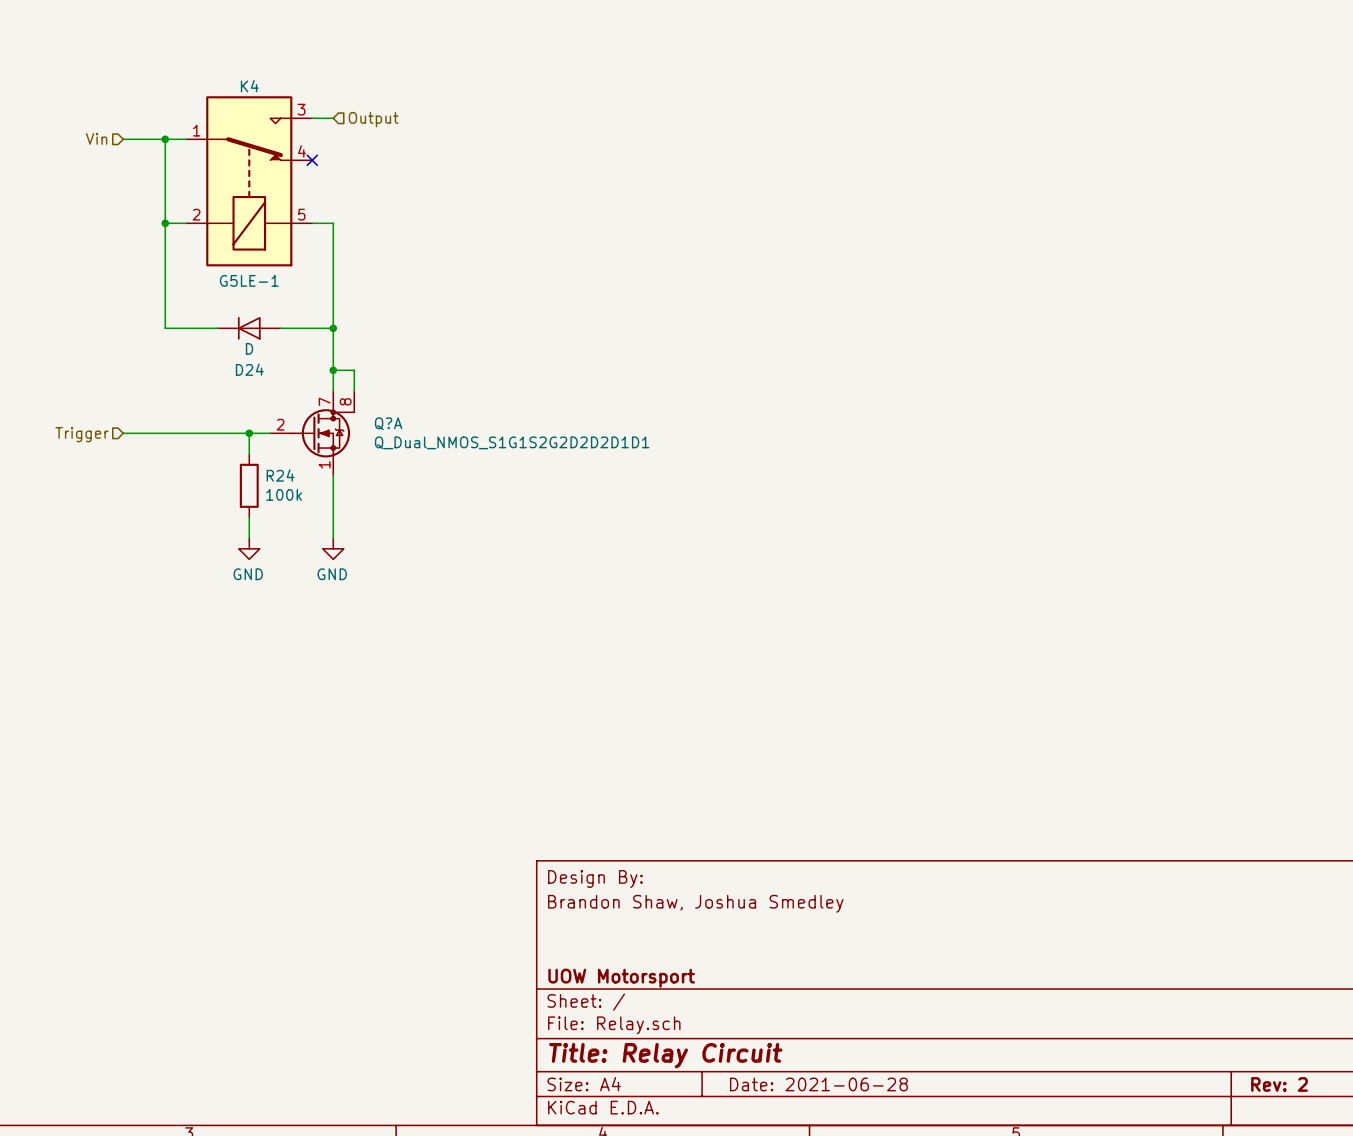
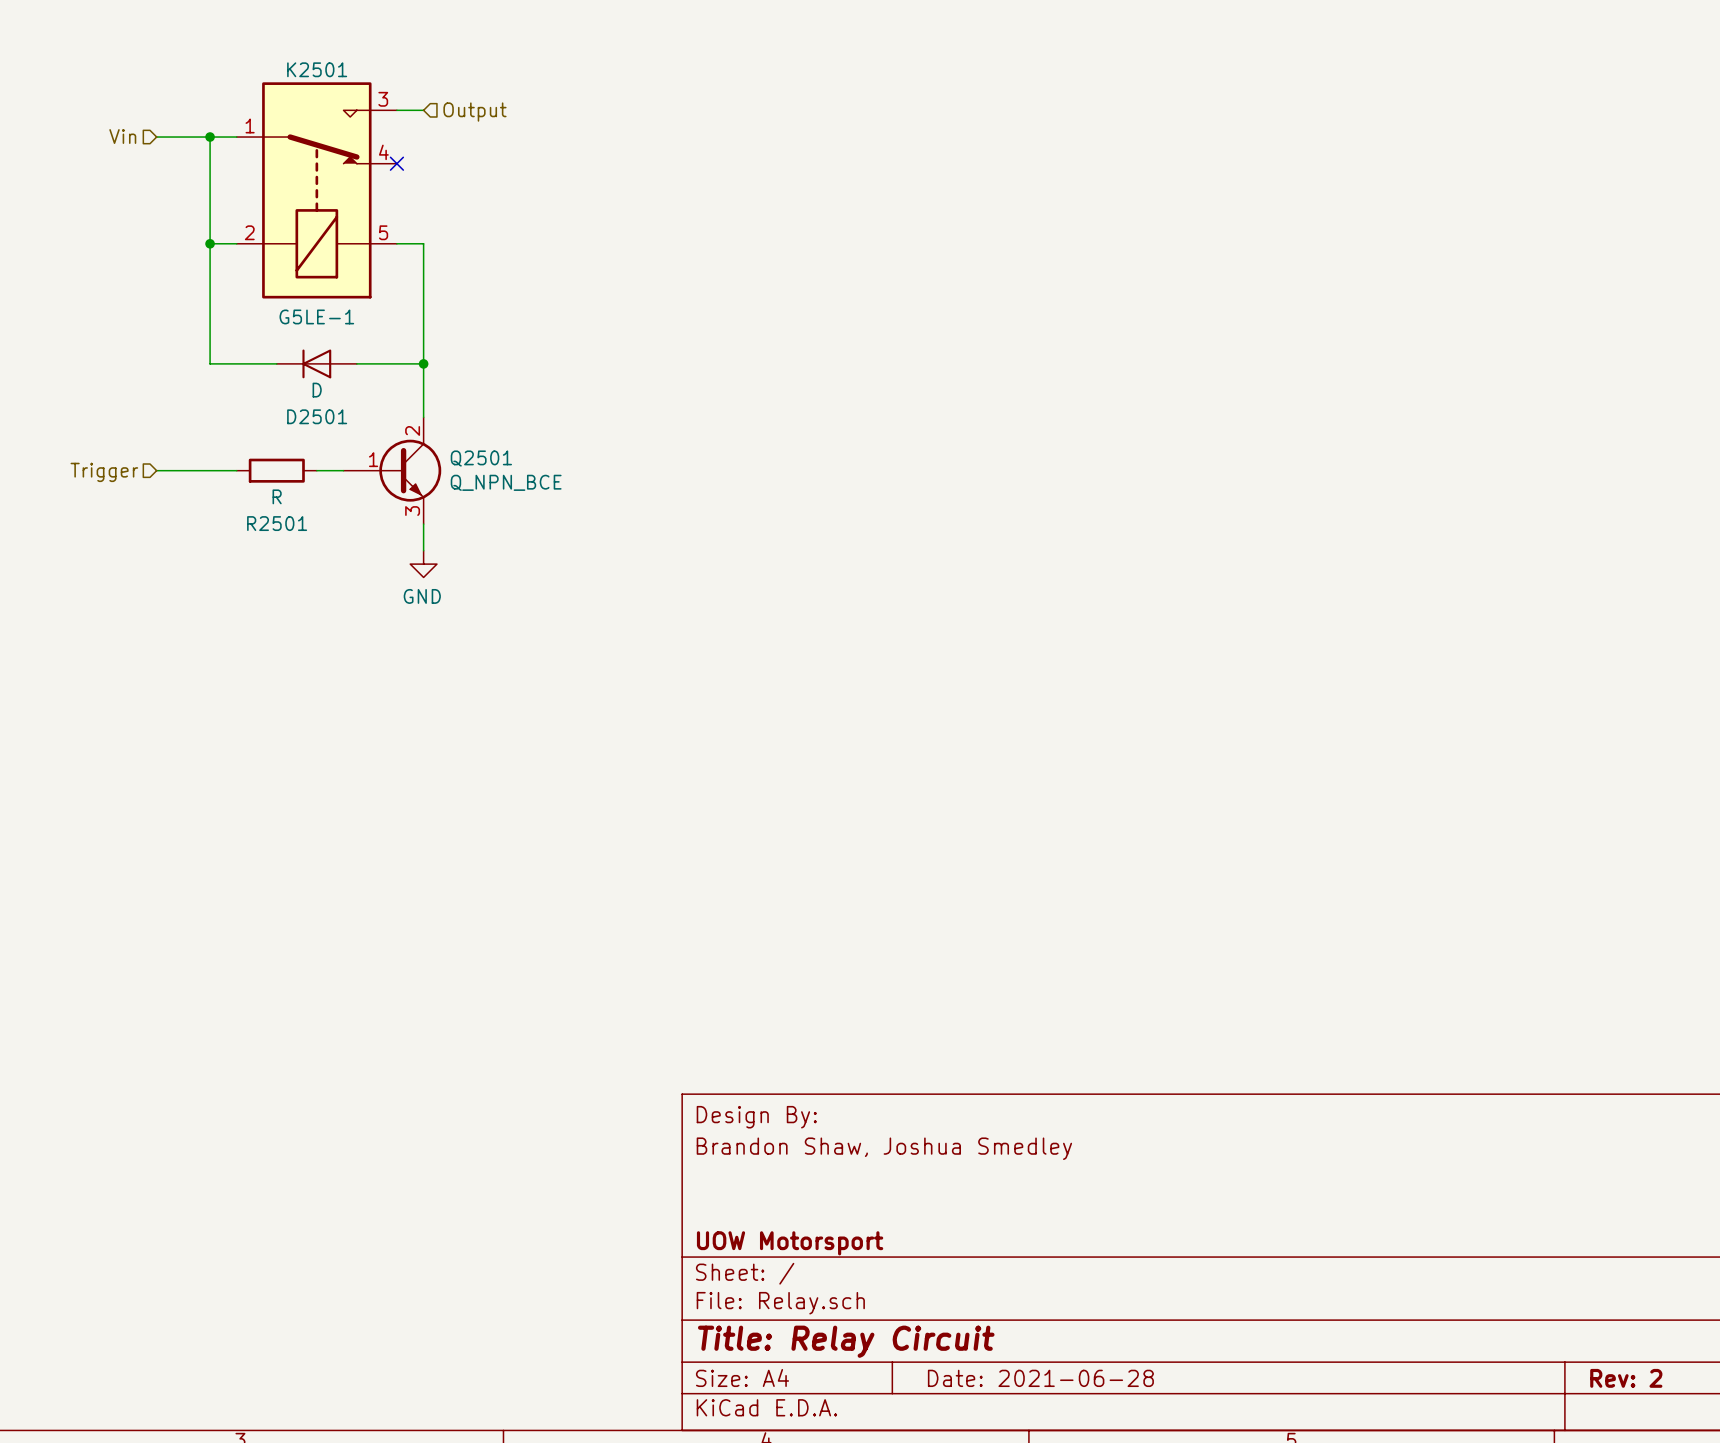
wire: none -> (210, 137) (210, 177)
junction: none -> (210, 137)
wire: (312, 118) (333, 118) -> (396, 110) (423, 110)
hierarchical label position: Output (373, 119) -> Output (474, 112)
hierarchical label position: Vin (96, 138) -> Vin (122, 136)
wire: (123, 139) (186, 139) -> (156, 137) (236, 137)
junction: (165, 139) -> none
K2501: none -> G5LE-1 (316, 190)
no-connect mark position: (312, 160) -> (396, 163)
K4: G5LE-1 (249, 181) -> none
junction: none -> (210, 243)
wire: (165, 223) (186, 223) -> (210, 243) (236, 243)
junction: (165, 223) -> none
wire: (312, 223) (333, 223) -> (396, 243) (423, 243) (423, 283)
wire: (165, 286) (165, 328) (217, 328) -> (210, 363) (276, 363)
D2501: none -> D (316, 363)
wire: none -> (356, 363) (423, 363)
junction: none -> (423, 363)
D24: D (249, 328) -> none
wire: (280, 328) (333, 328) (333, 391) -> none
junction: (333, 328) -> none
wire: none -> (156, 470) (236, 470)
R2501: none -> R (276, 470)
wire: none -> (316, 470) (343, 470)
Q2501: none -> Q_NPN_BCE (392, 470)
wire: (333, 370) (354, 370) (354, 391) -> none
junction: (333, 370) -> none
wire: (123, 433) (270, 433) -> none
wire: (249, 433) (249, 454) -> (423, 524) (423, 550)
junction: (249, 433) -> none
Q?A: Q_Dual_NMOS_S1G1S2G2D2D2D1D1 (312, 433) -> none
hierarchical label position: Trigger (82, 434) -> Trigger (104, 472)
power symbol: none -> GND (423, 564)
wire: (333, 475) (333, 538) -> none
R24: 100k (249, 485) -> none
wire: (249, 517) (249, 538) -> none
power symbol: GND (249, 548) -> none
power symbol: GND (333, 548) -> none

